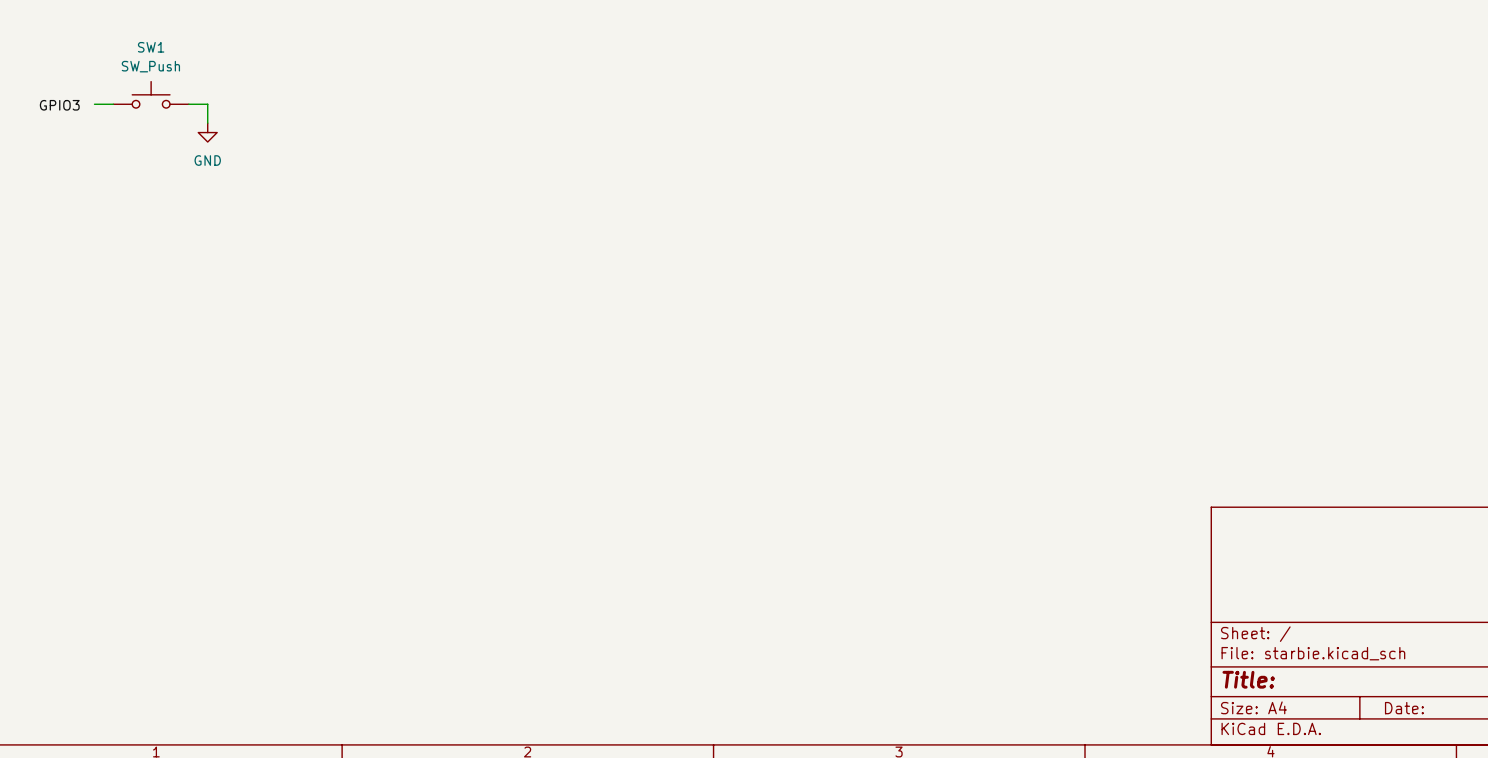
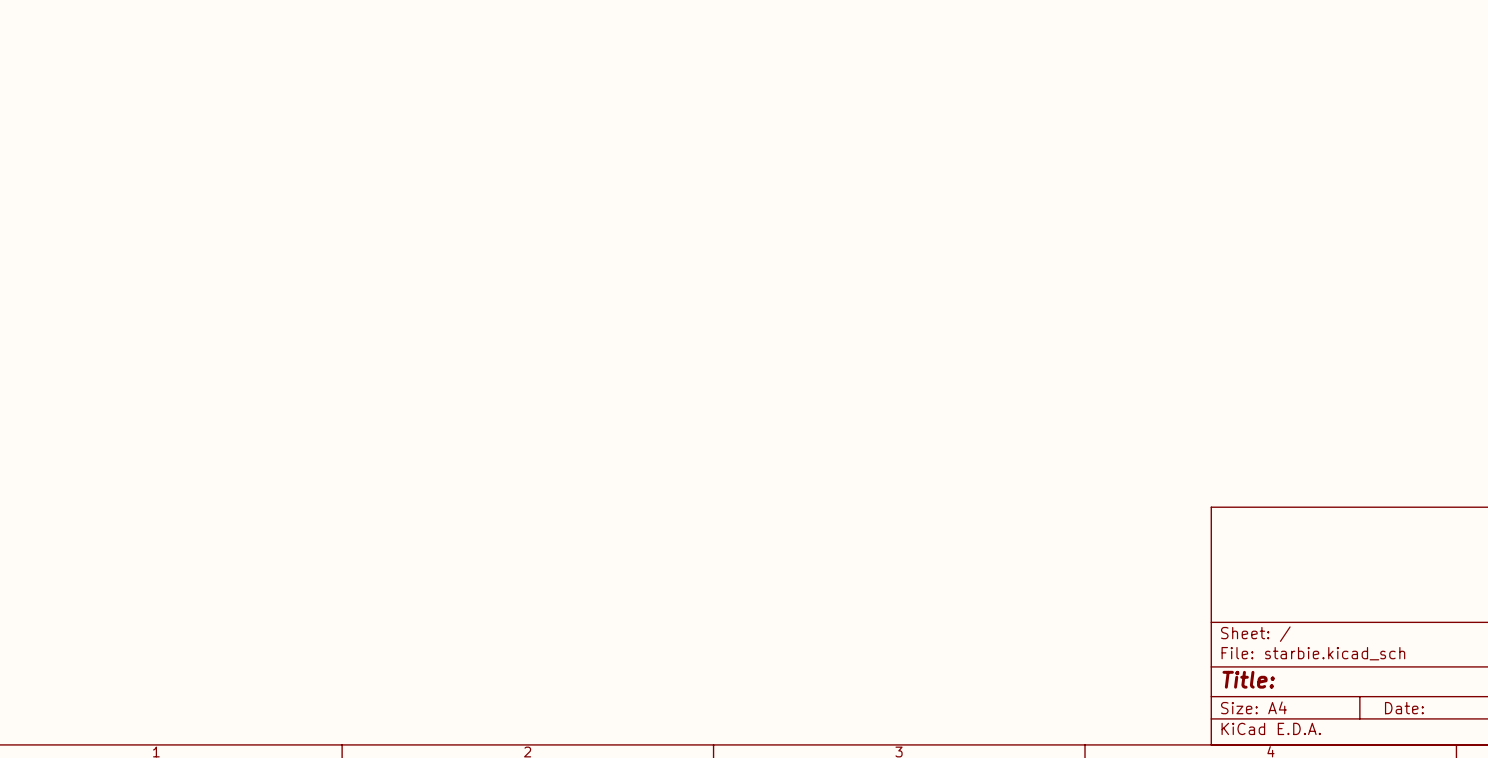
SW1: SW_Push (151, 94) -> none
wire: (94, 104) (113, 104) -> none
wire: (188, 104) (207, 104) (207, 123) -> none
label: GPIO3 (59, 105) -> none
power symbol: GND (207, 132) -> none

